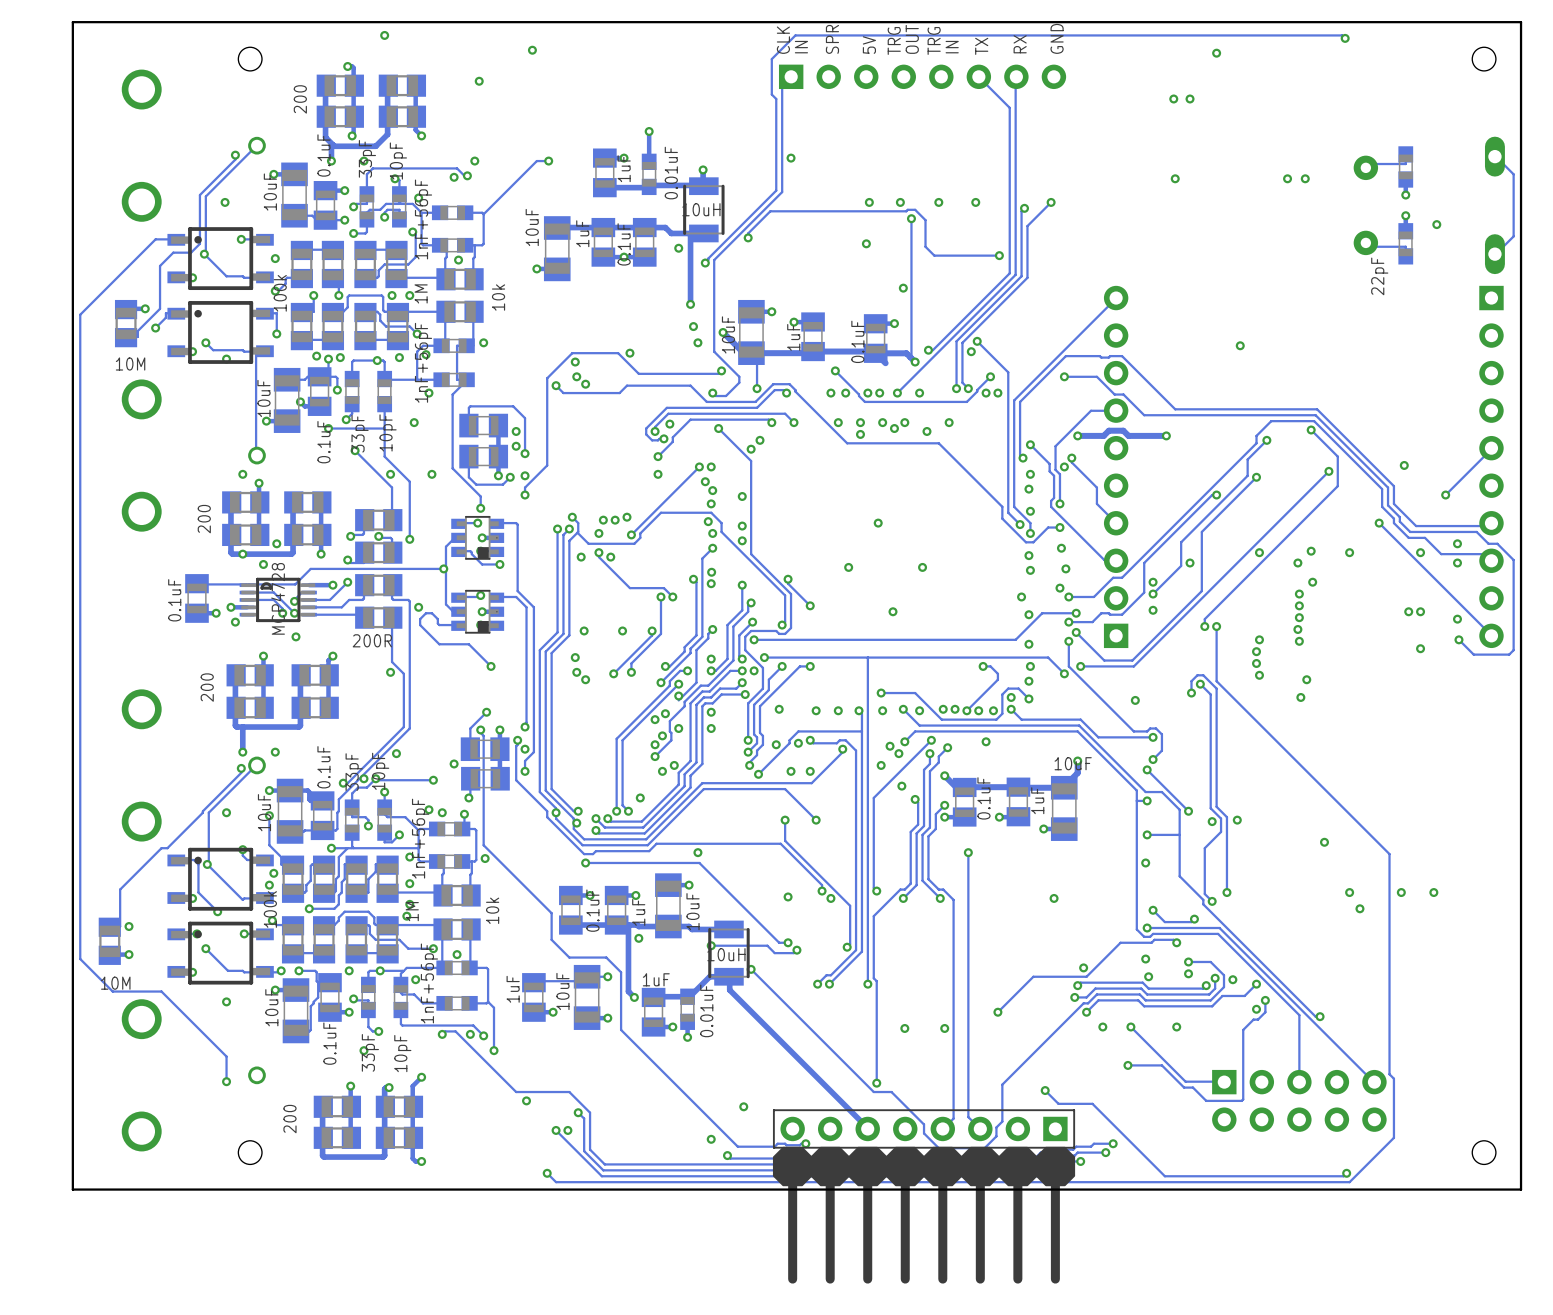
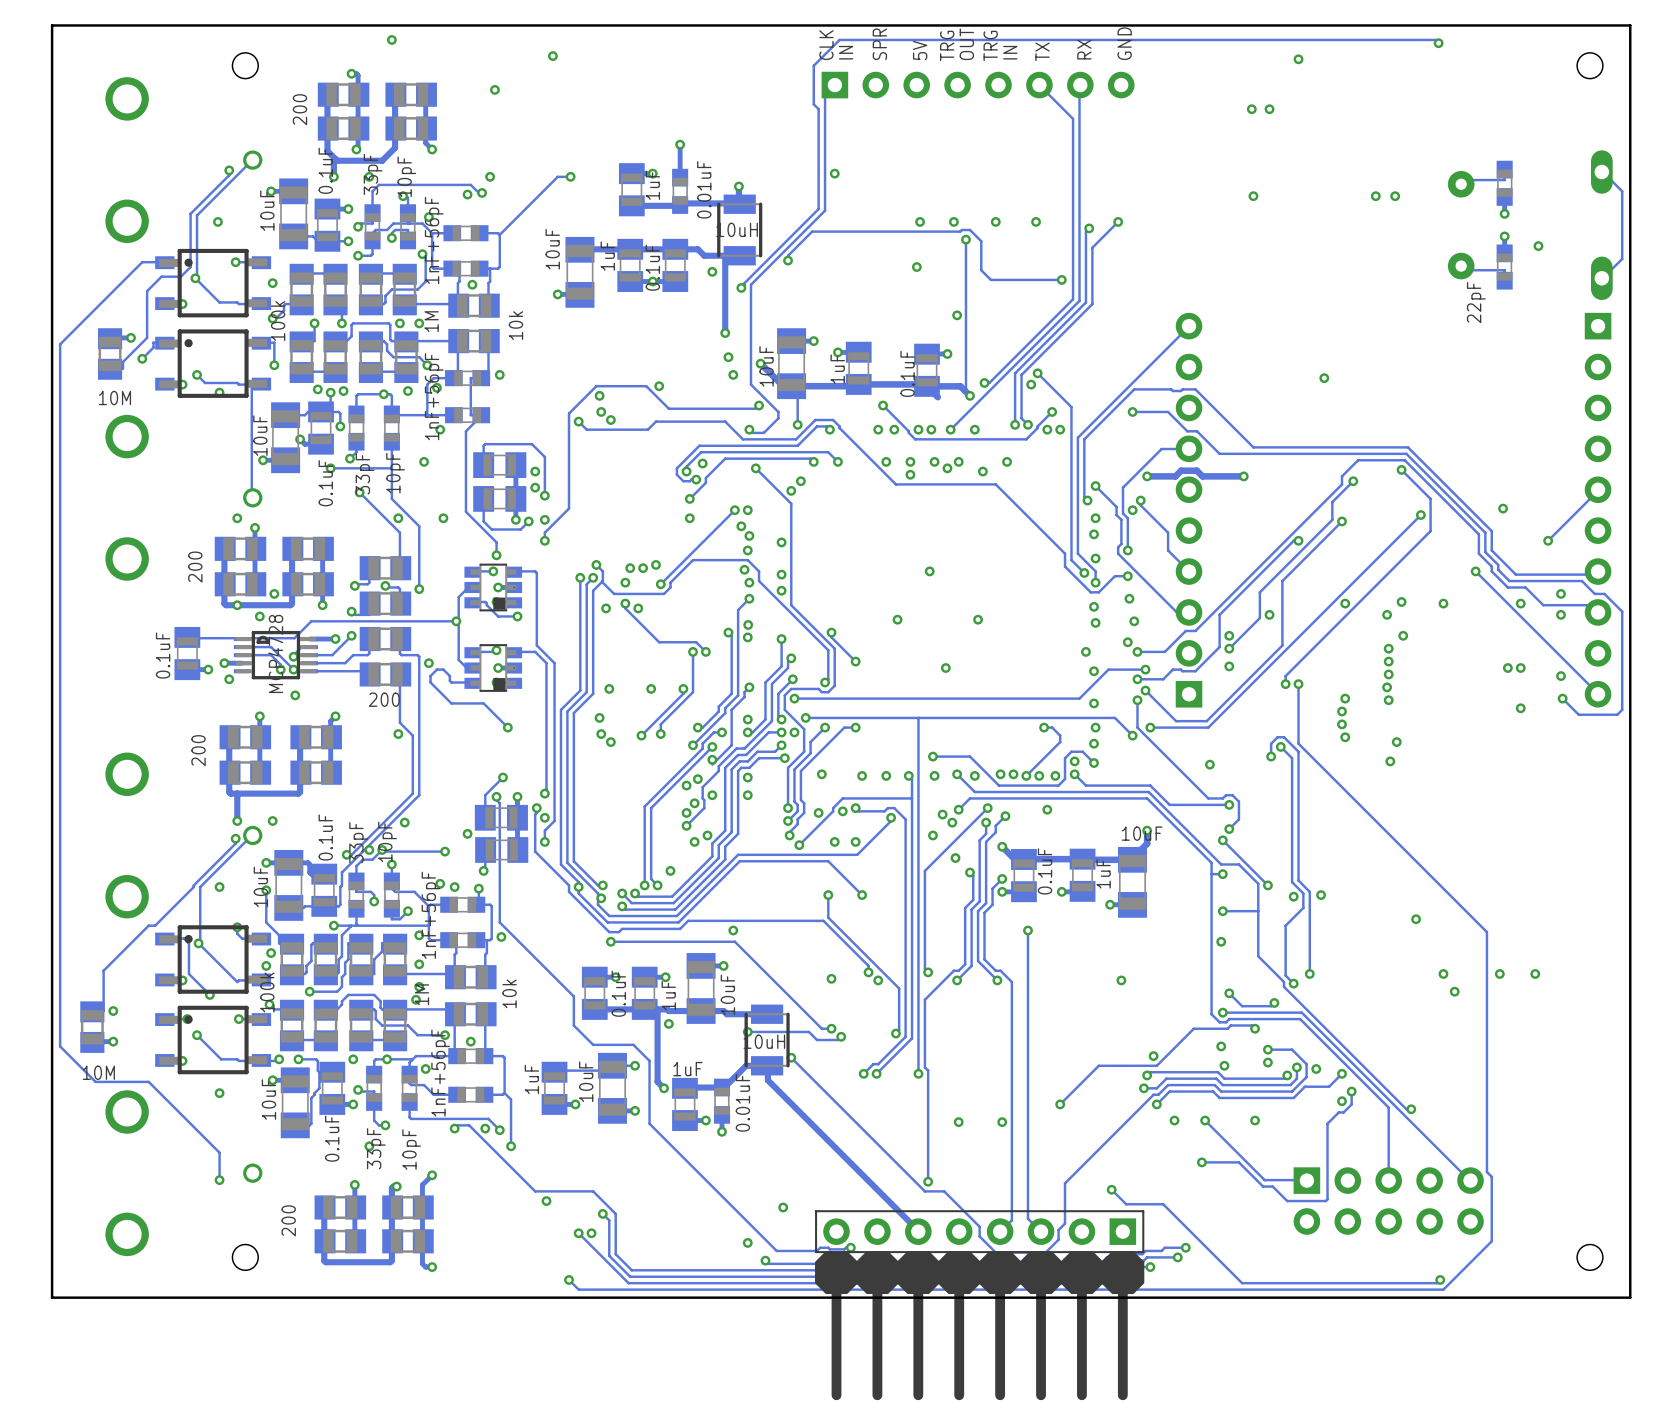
part value: 200R (372, 640) -> 200 (384, 699)

